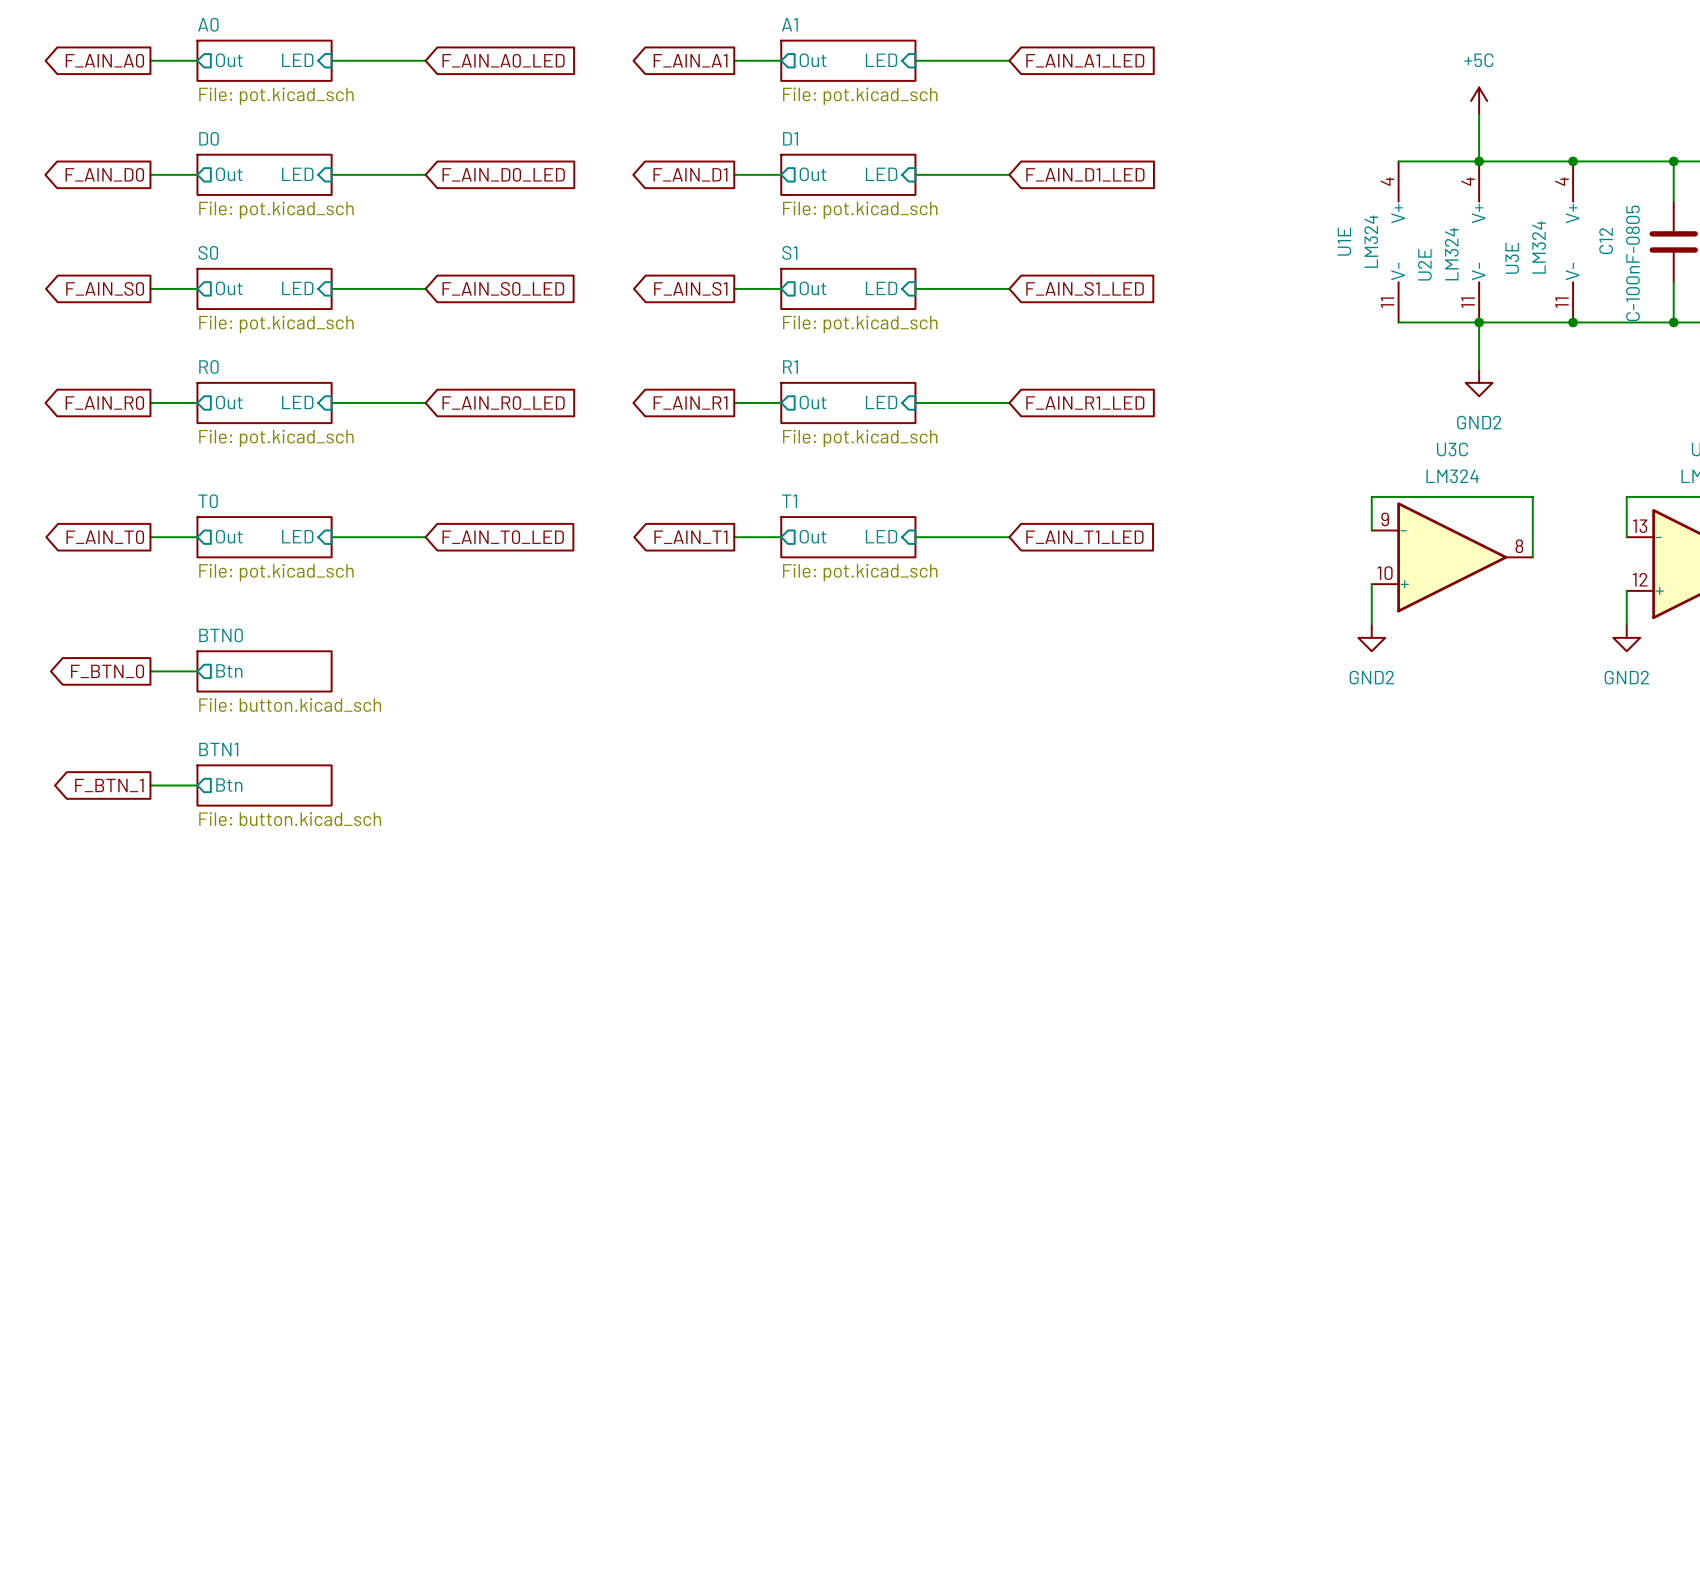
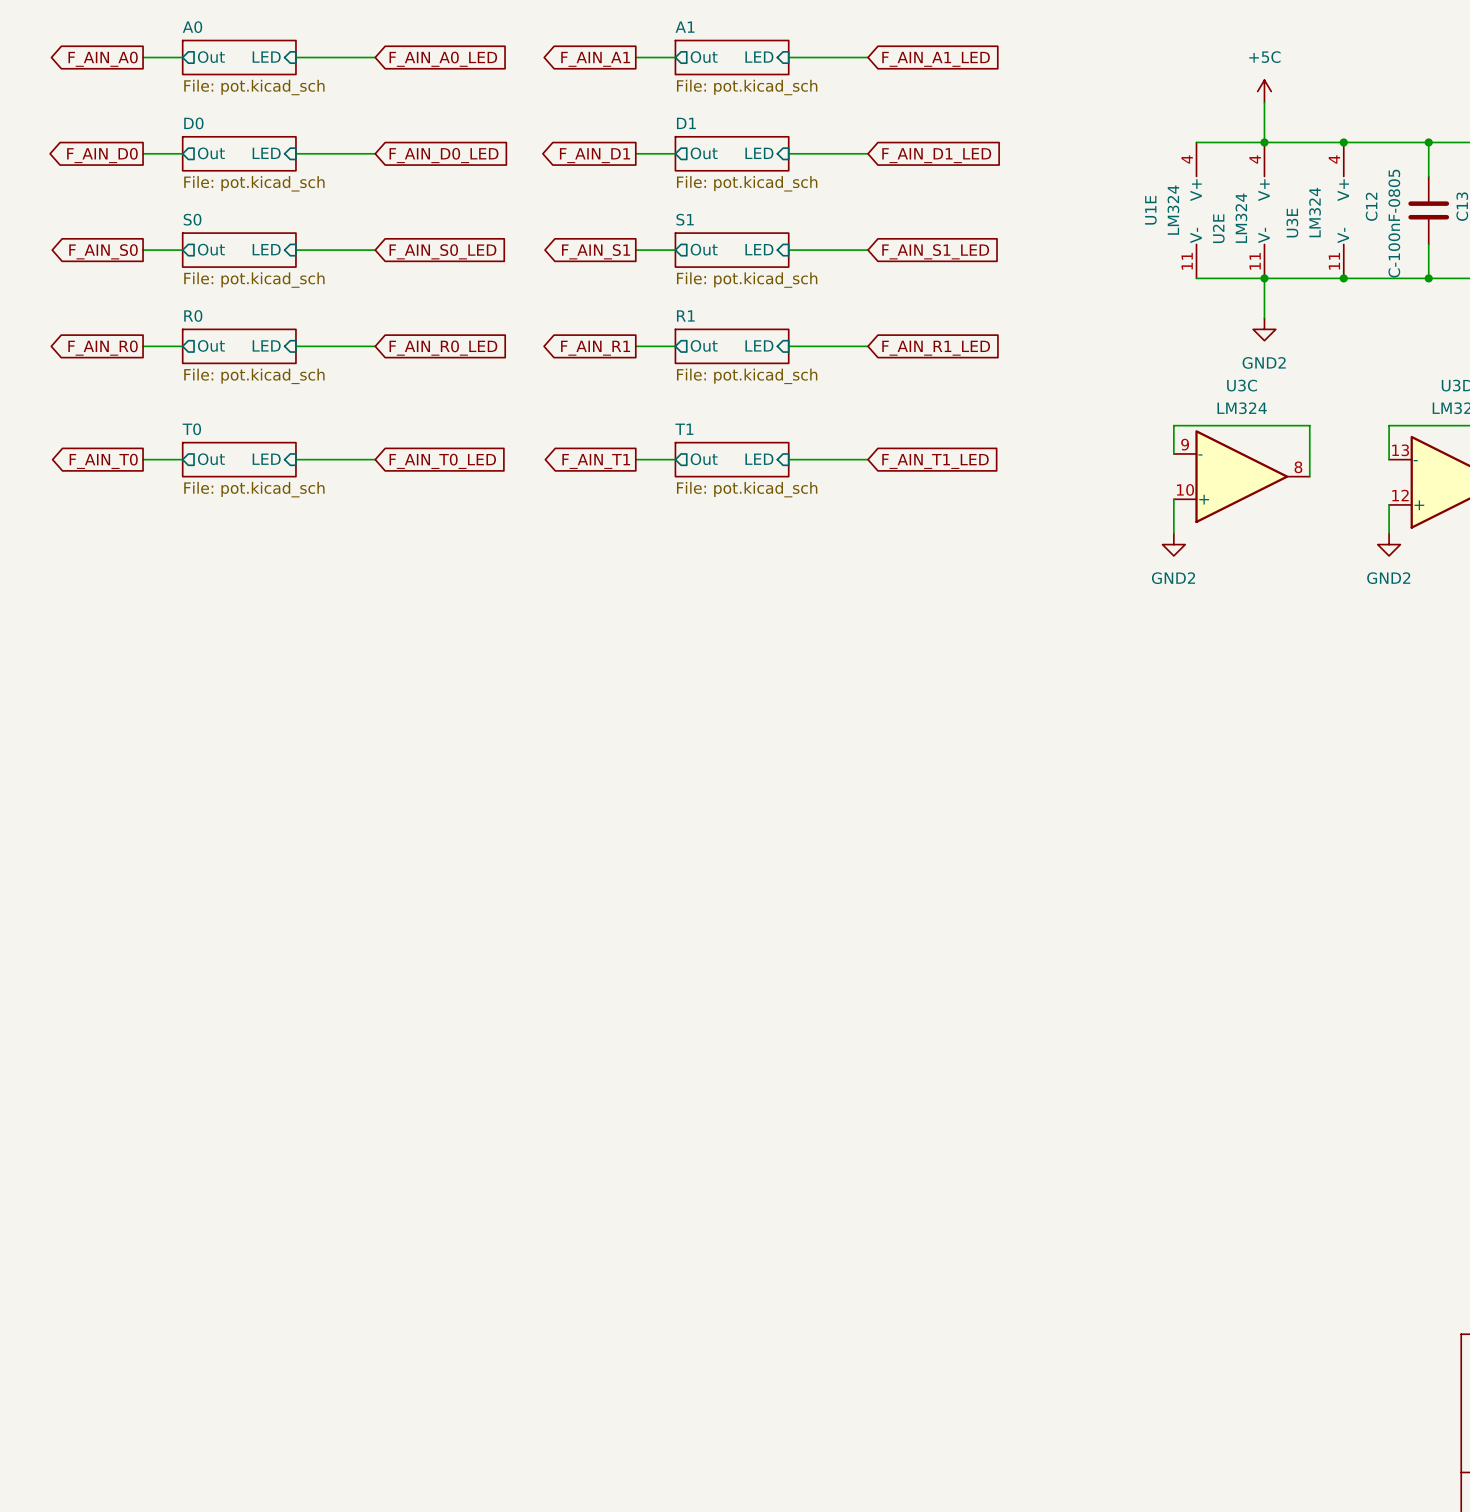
sheet pin: Btn (229, 670) -> none
global label: F_BTN_0 (107, 671) -> none
wire: (150, 671) (197, 671) -> none
sheet BTN0: File: button.kicad_sch (264, 671) -> none
sheet pin: Btn (229, 784) -> none
global label: F_BTN_1 (109, 785) -> none
wire: (150, 785) (197, 785) -> none
sheet BTN1: File: button.kicad_sch (264, 785) -> none

